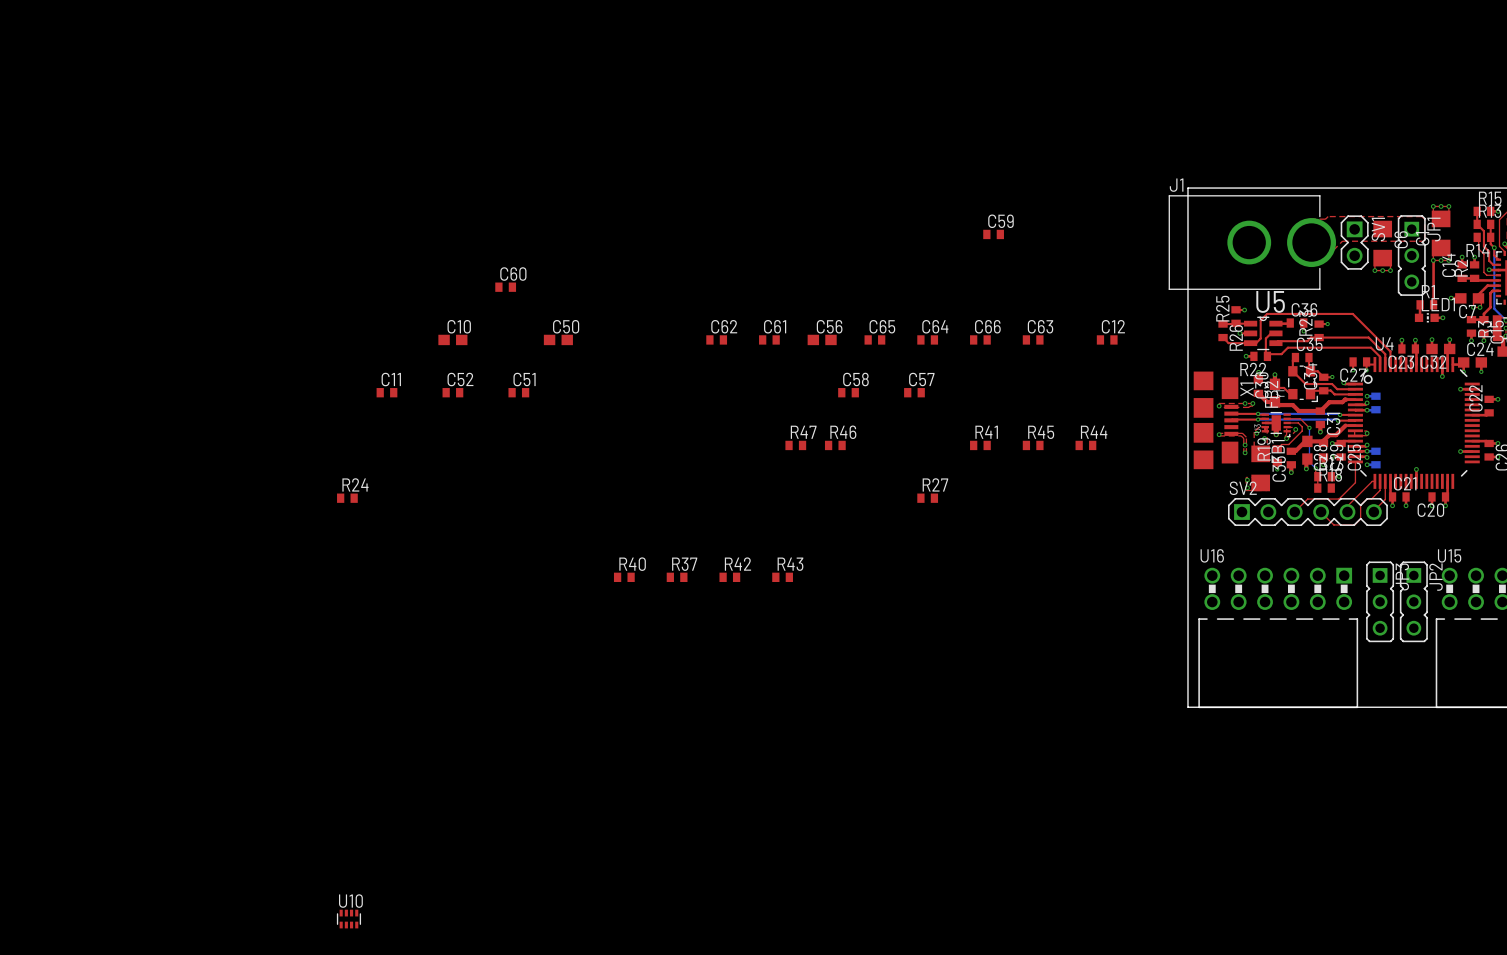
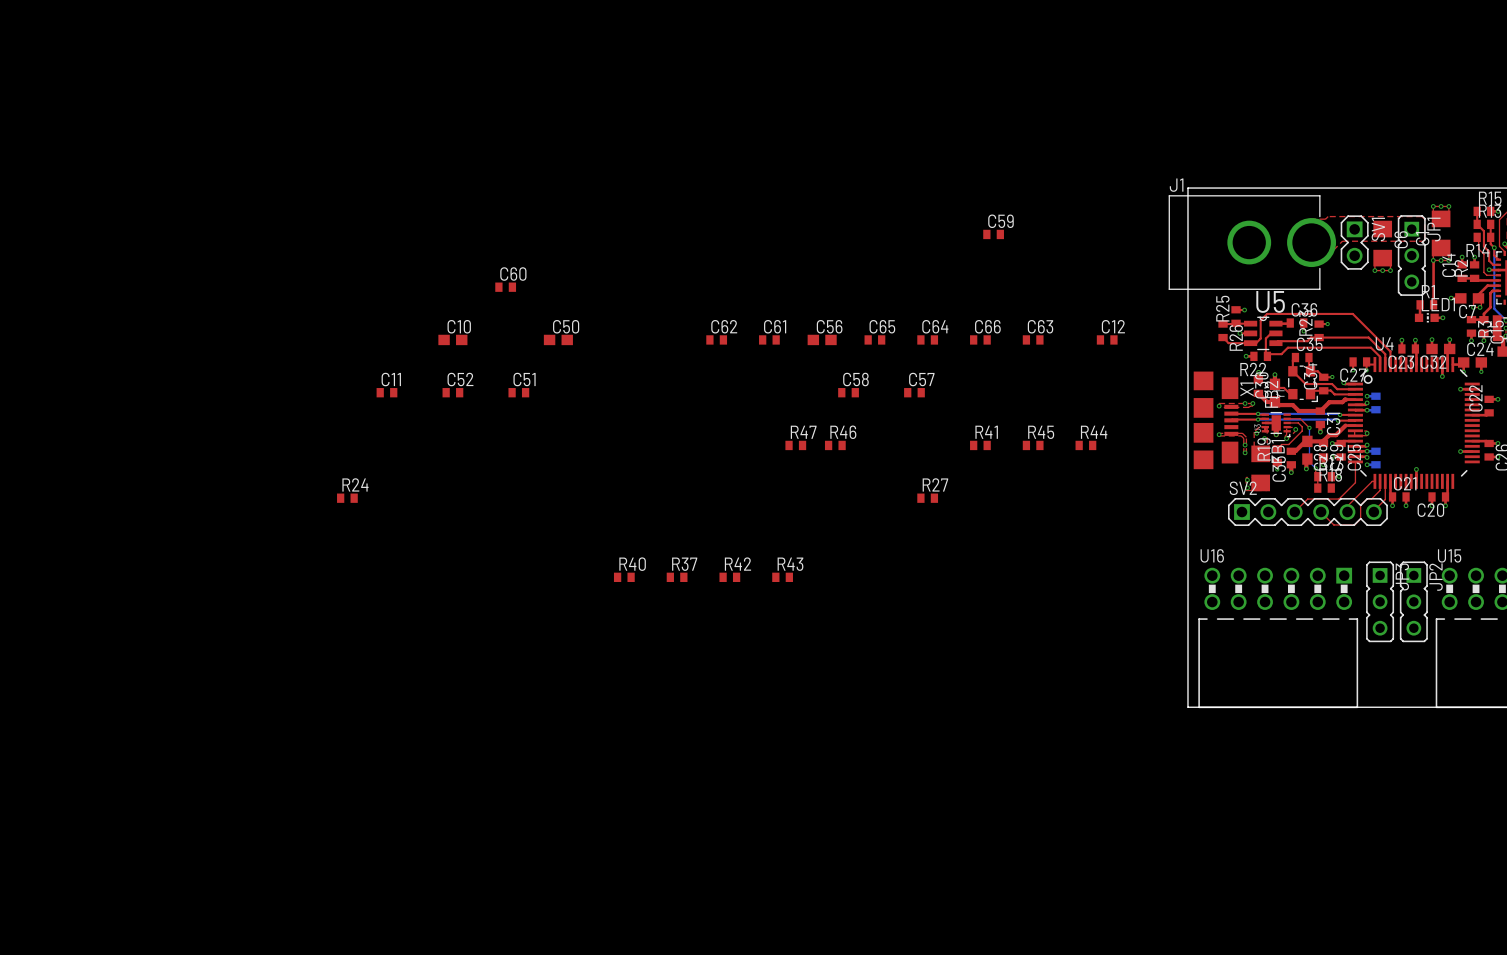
U10: (348, 919) -> none

